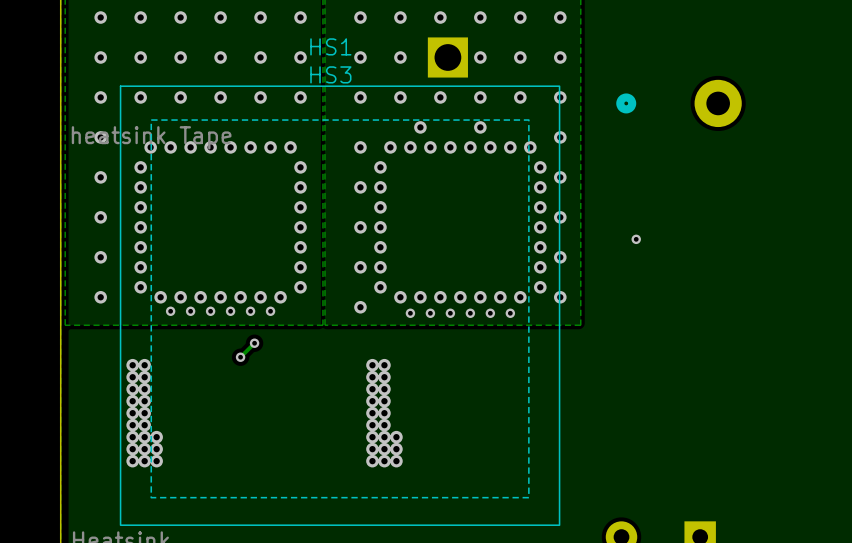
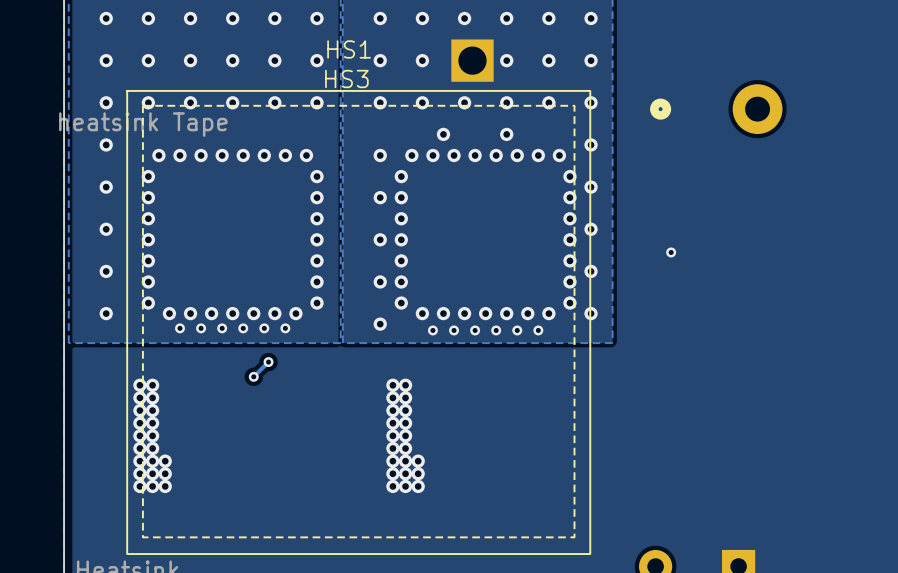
HS3 footprint: [150, 119, 530, 499] -> [142, 104, 576, 539]

